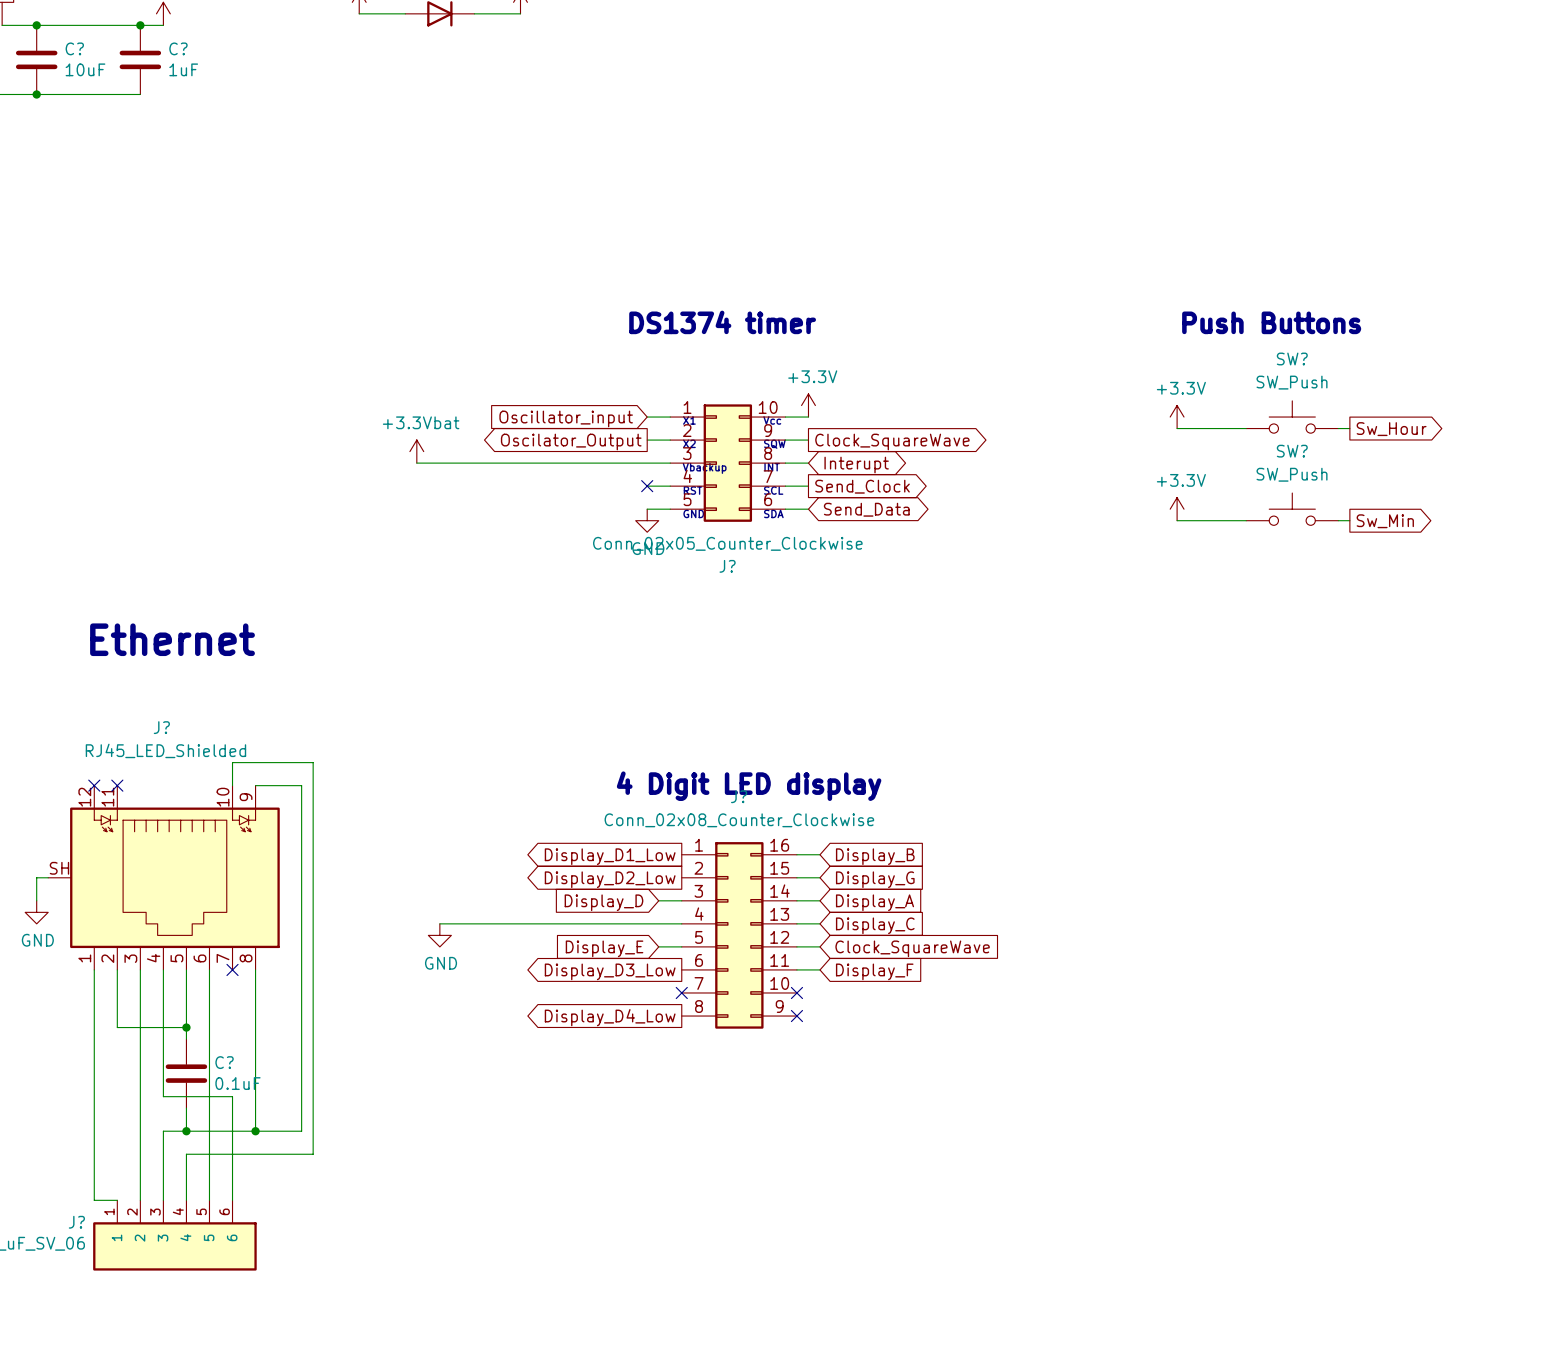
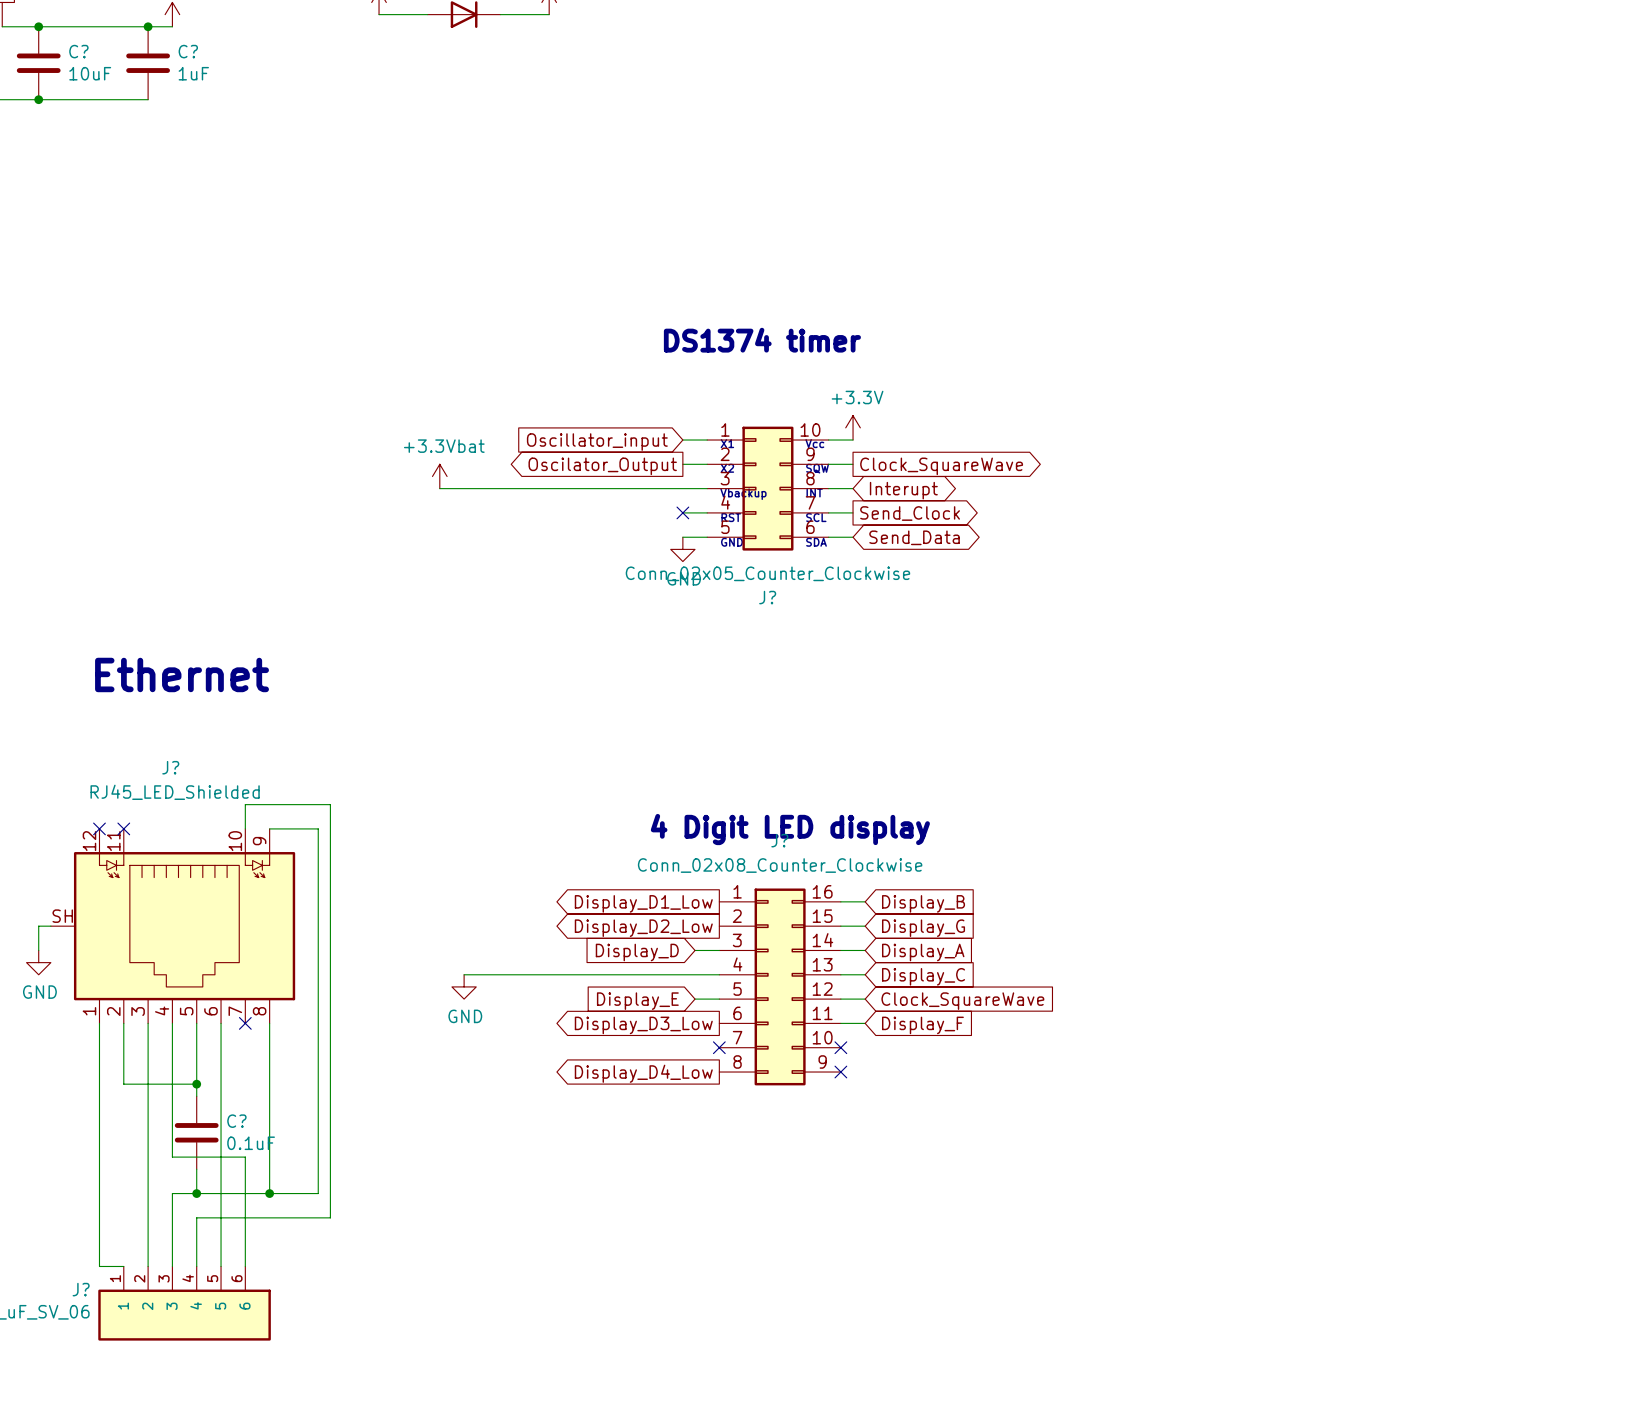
text: Push Buttons (1271, 322) -> none
power symbol: +3.3V (1177, 417) -> none
SW?: SW_Push (1292, 417) -> none
wire: (1177, 428) (1246, 428) -> none
wire: (1338, 428) (1349, 428) -> none
global label: Sw_Hour (1391, 429) -> none
power symbol: +3.3V (1177, 509) -> none
SW?: SW_Push (1292, 509) -> none
wire: (1177, 520) (1246, 520) -> none
wire: (1338, 520) (1349, 520) -> none
global label: Sw_Min (1385, 521) -> none

